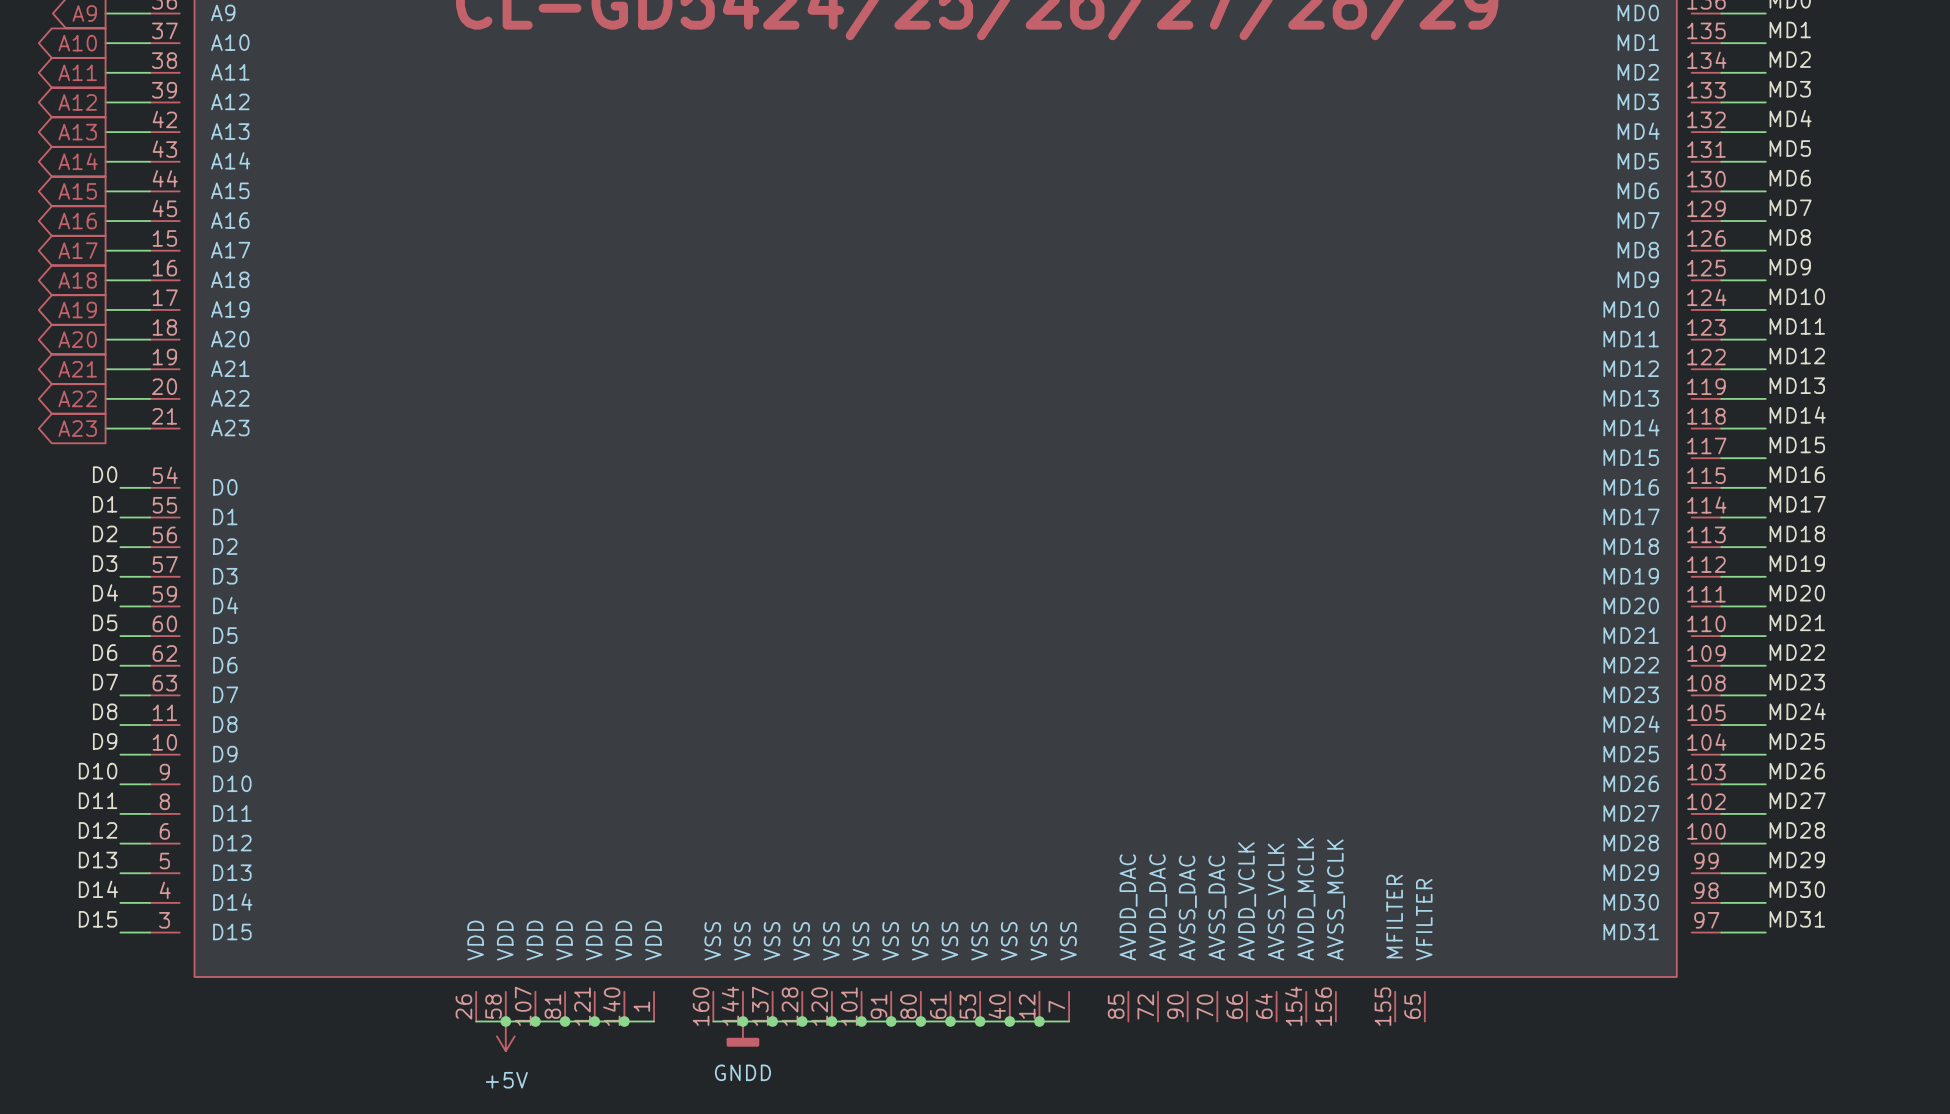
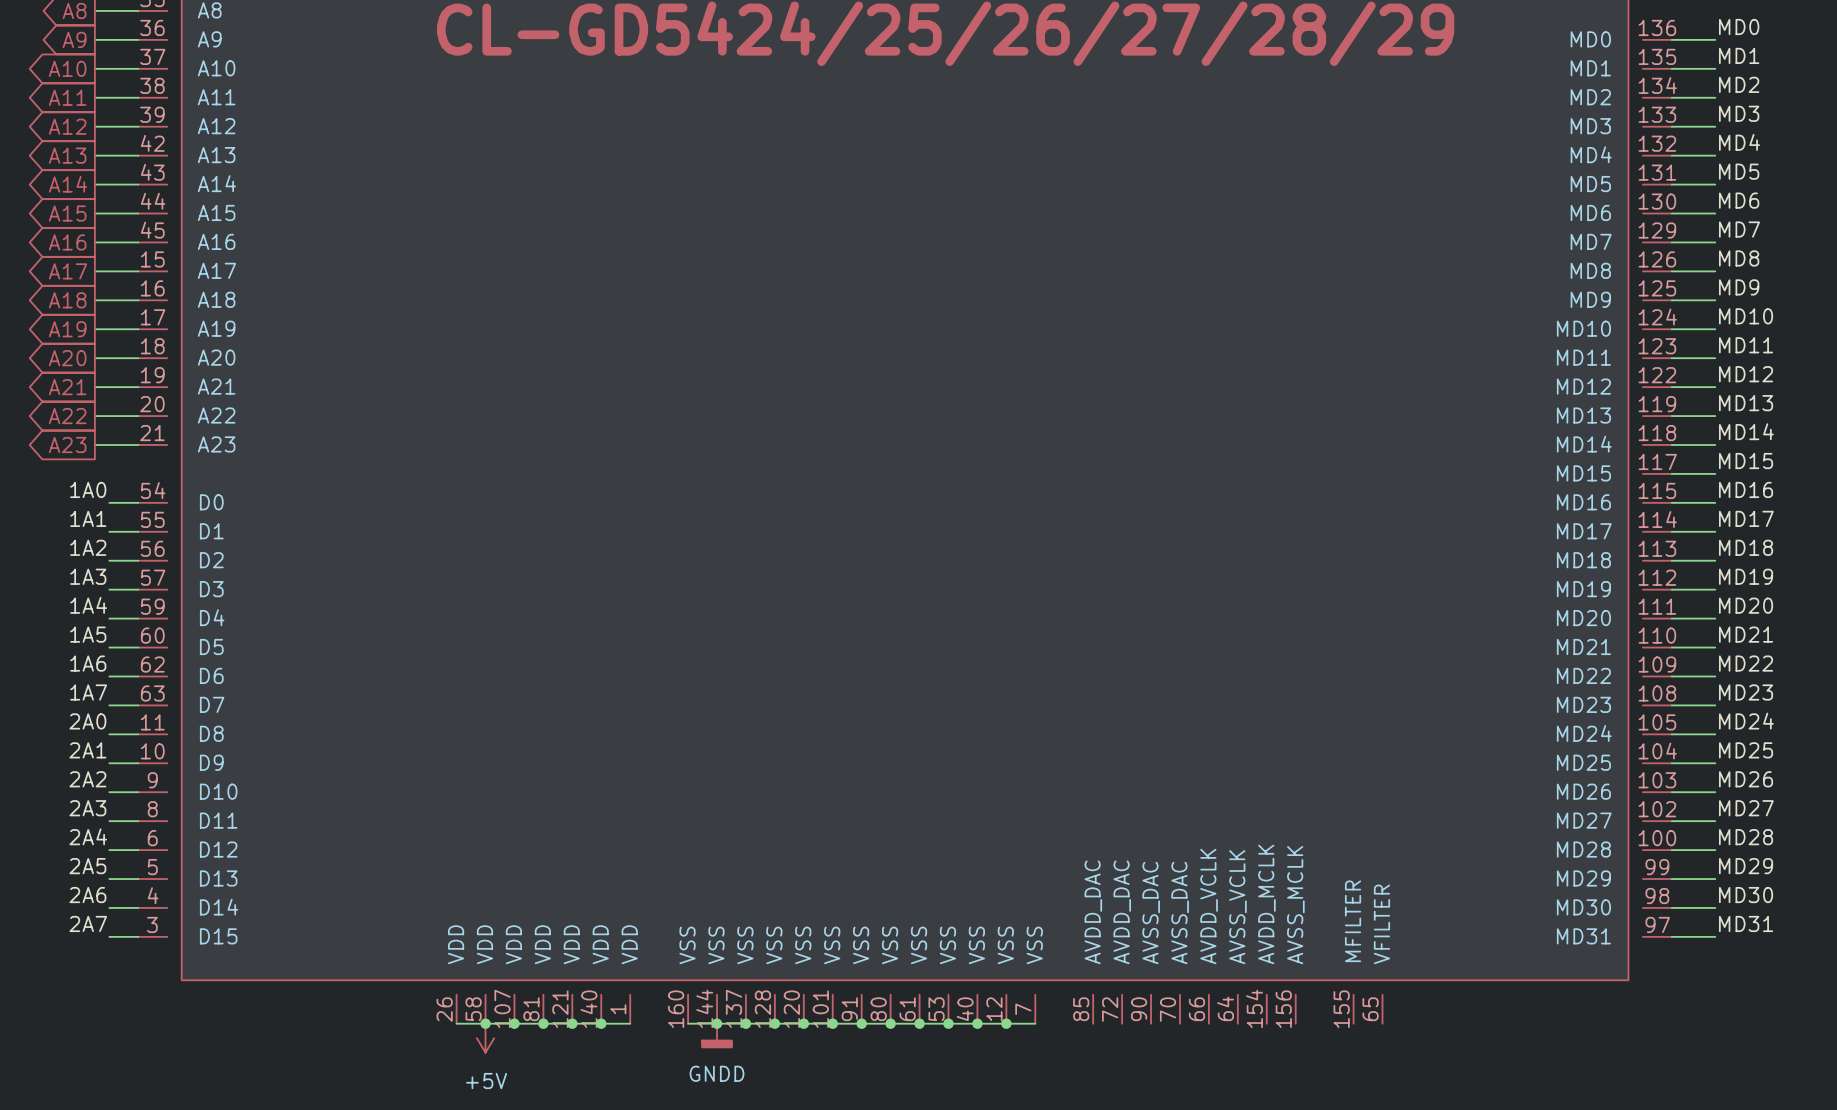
label: D0 (105, 474) -> 1A0 (88, 489)
label: D1 (105, 504) -> 1A1 (88, 518)
label: D2 (105, 533) -> 1A2 (88, 547)
label: D3 (105, 563) -> 1A3 (88, 576)
label: D4 (105, 592) -> 1A4 (88, 605)
label: D5 (105, 622) -> 1A5 (88, 634)
label: D6 (105, 652) -> 1A6 (88, 663)
label: D7 (105, 682) -> 1A7 (88, 692)
label: D8 (105, 711) -> 2A0 (87, 721)
label: D9 (105, 741) -> 2A1 (87, 750)
label: D10 (98, 771) -> 2A2 (87, 779)
label: D11 (98, 800) -> 2A3 (87, 808)
label: D12 (98, 830) -> 2A4 (88, 836)
label: D13 (98, 860) -> 2A5 (87, 866)
label: D14 (98, 889) -> 2A6 (87, 895)
label: D15 (98, 919) -> 2A7 (88, 923)

